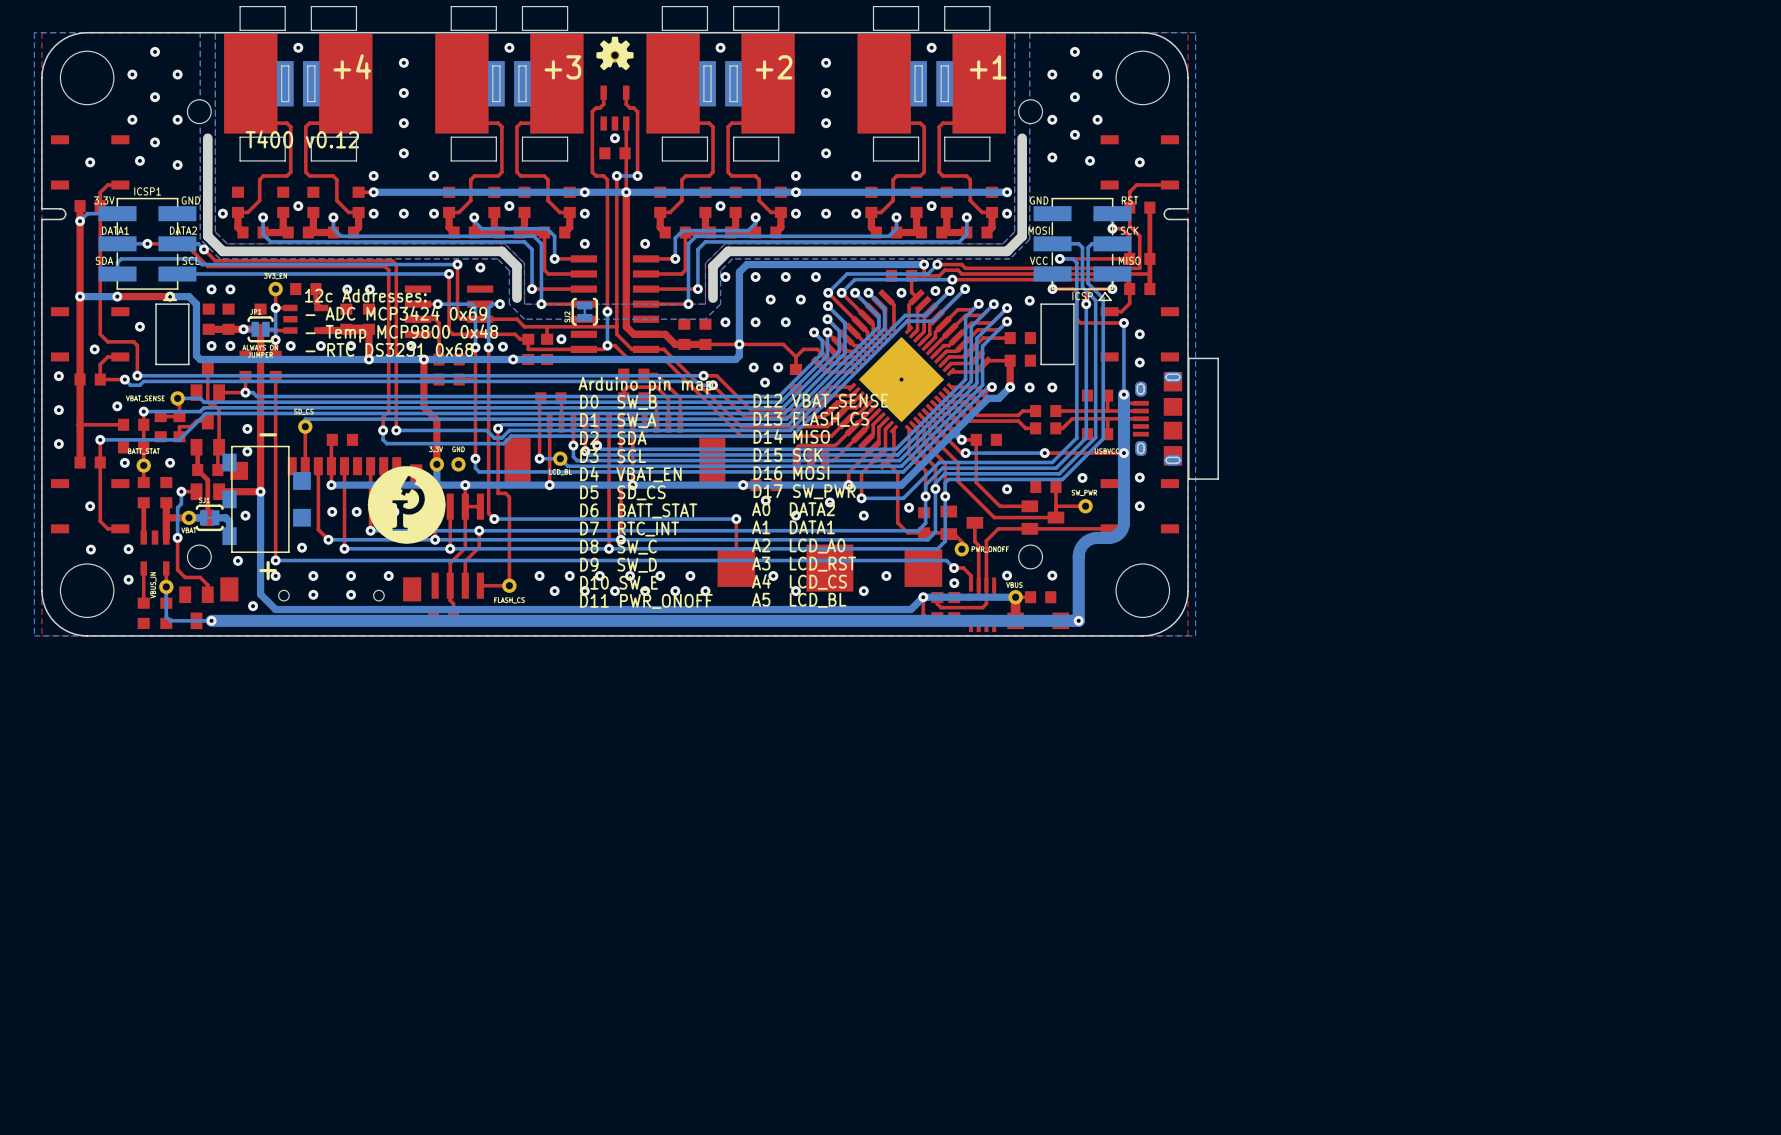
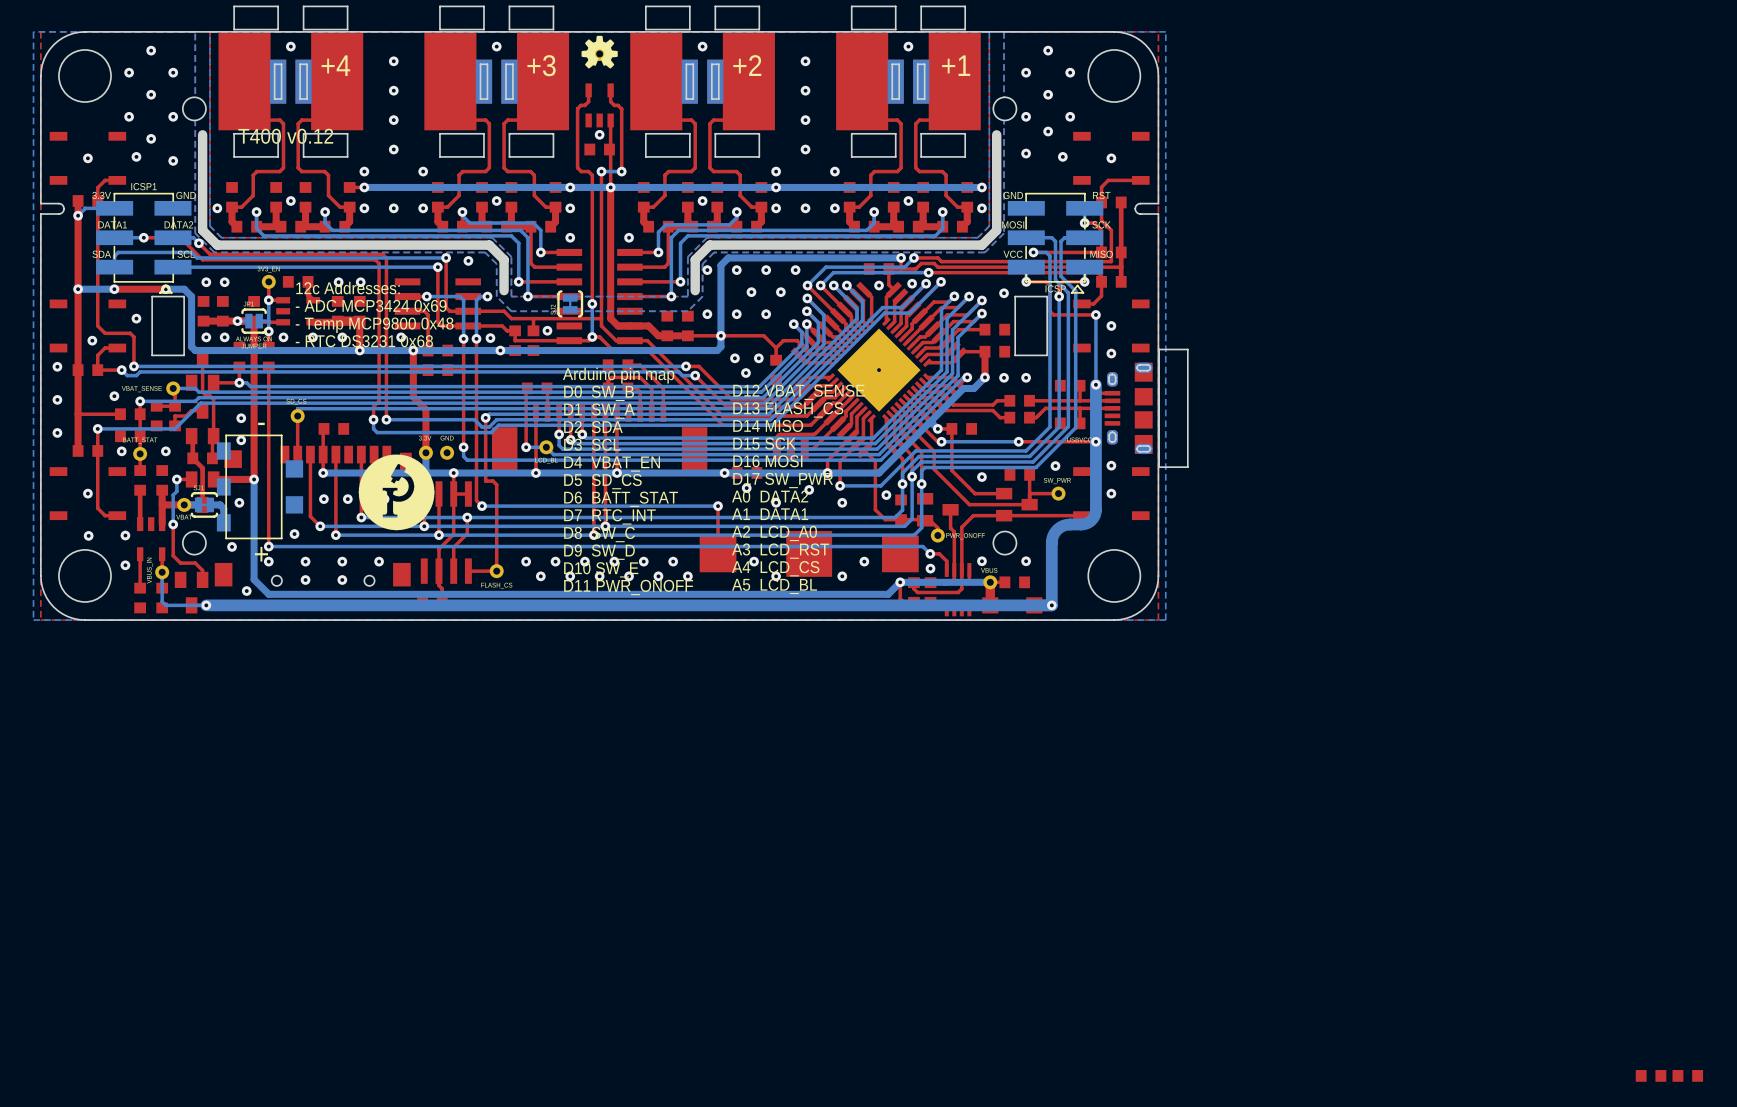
part: none -> (1651, 1075)
part: none -> (1687, 1075)

